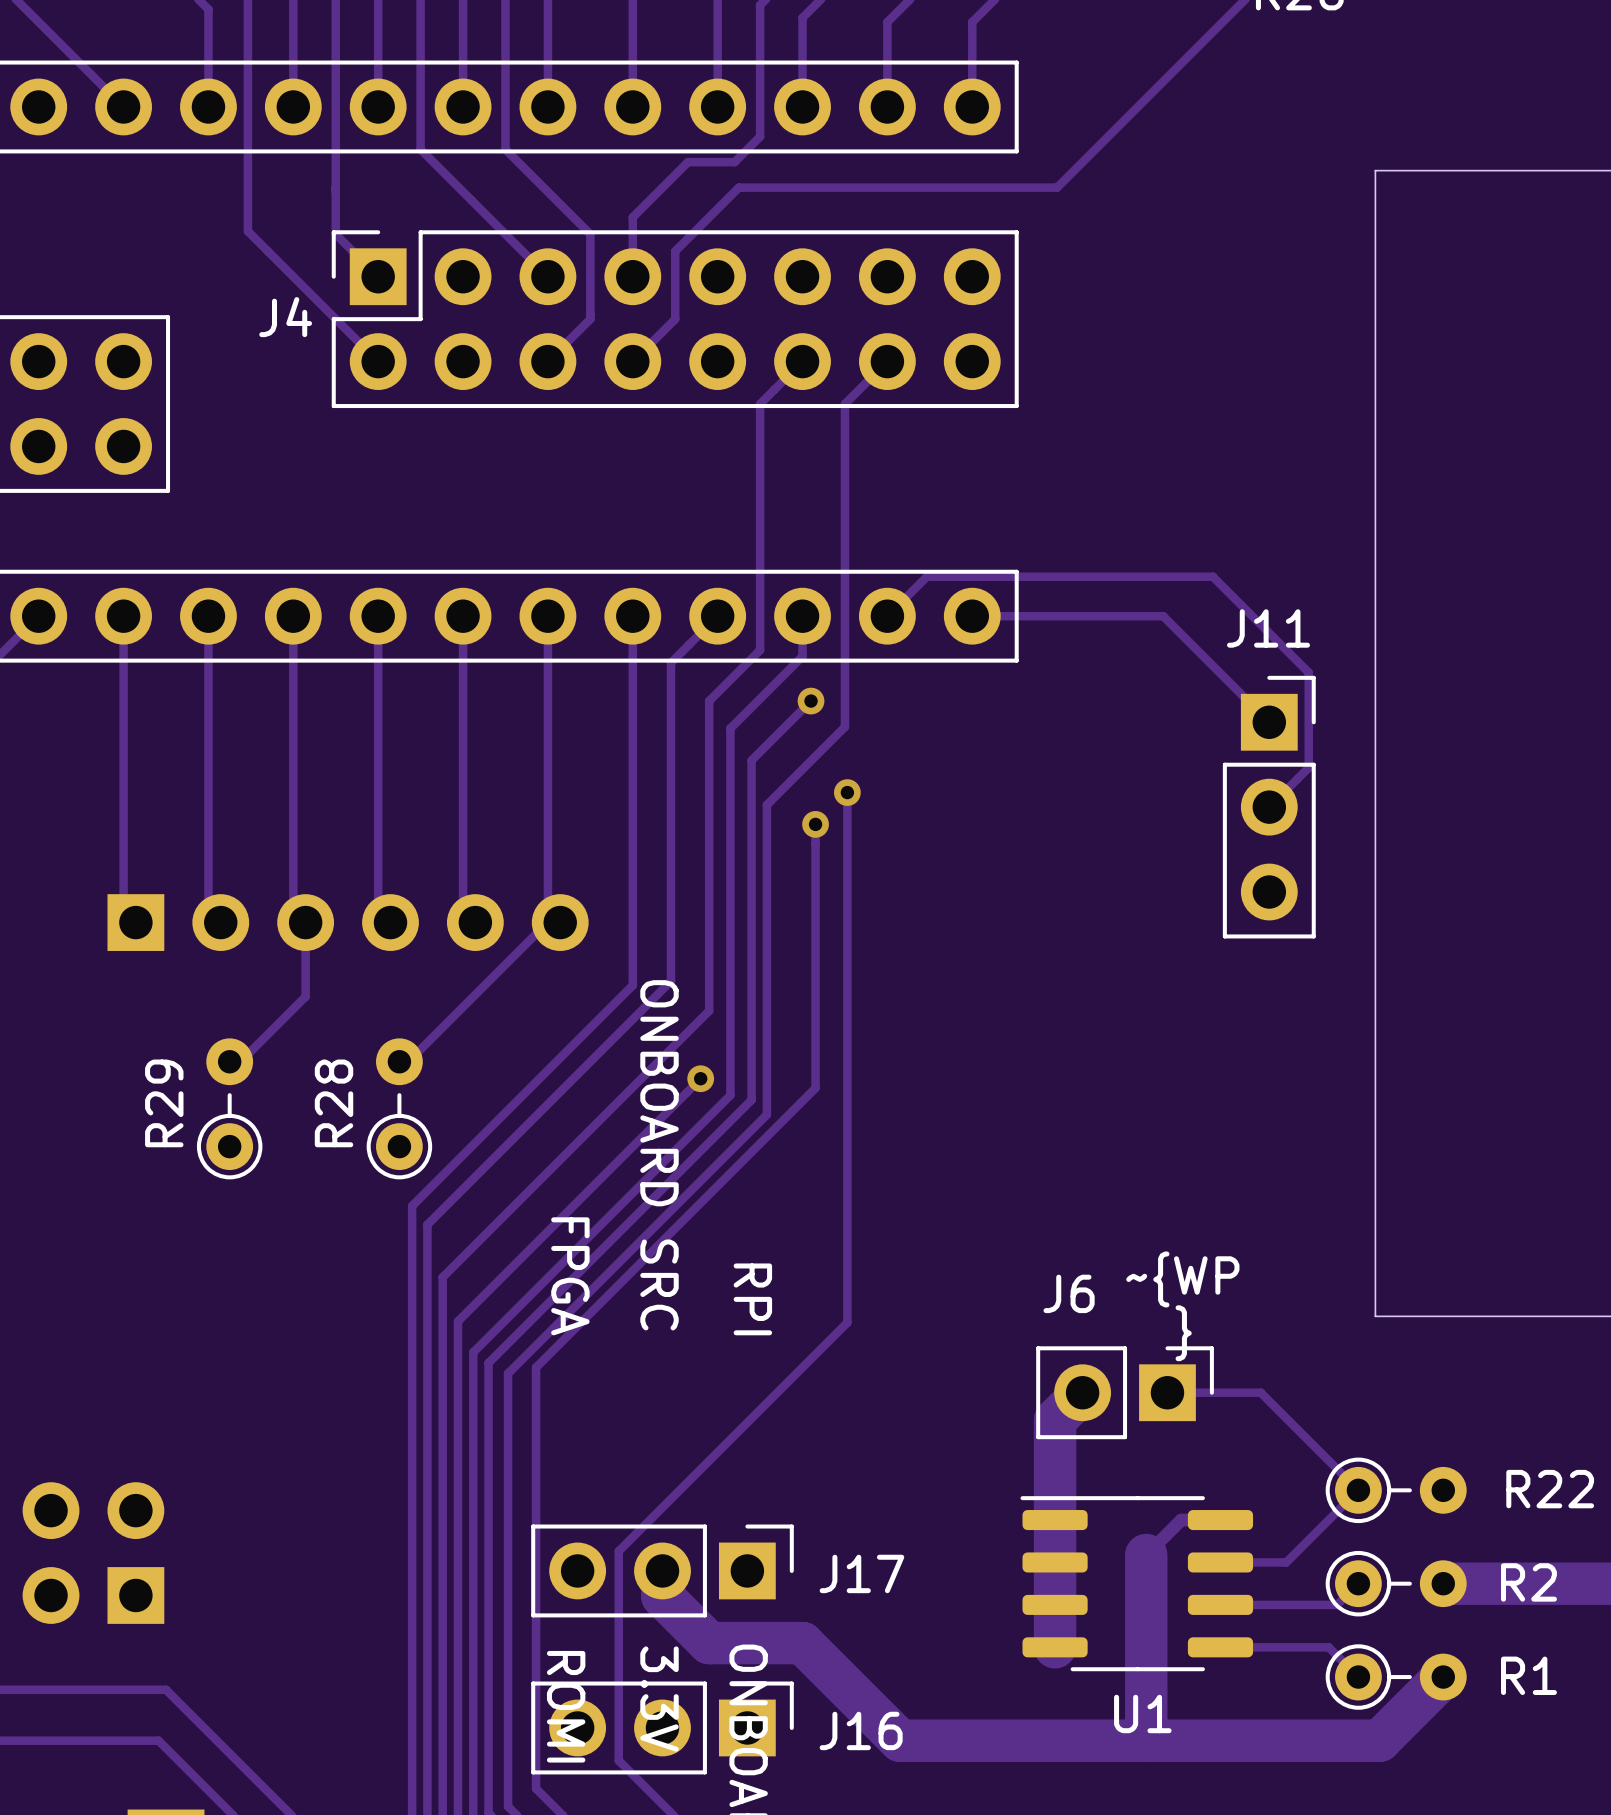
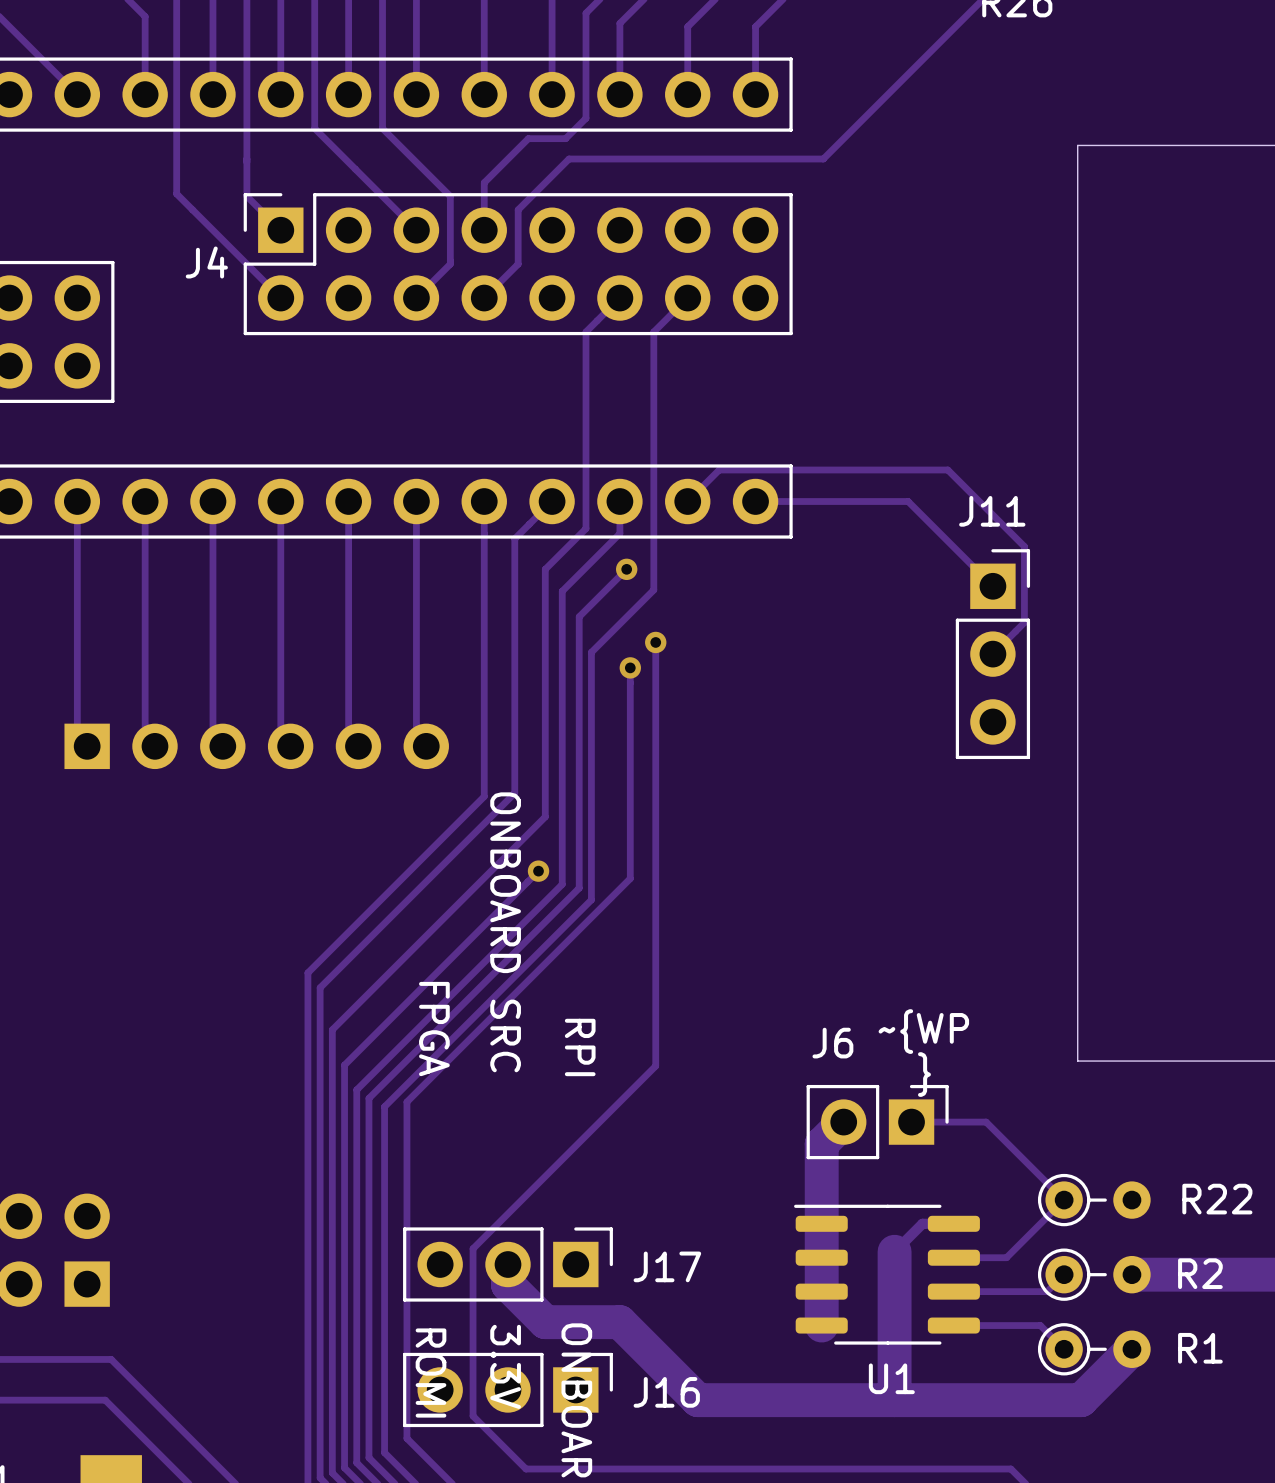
track: (305, 922) (305, 996) (240, 1061) (229, 1061) -> none
track: (560, 922) (547, 922) (408, 1061) (399, 1061) -> none
R29: (229, 1108) -> none
R28: (399, 1108) -> none

